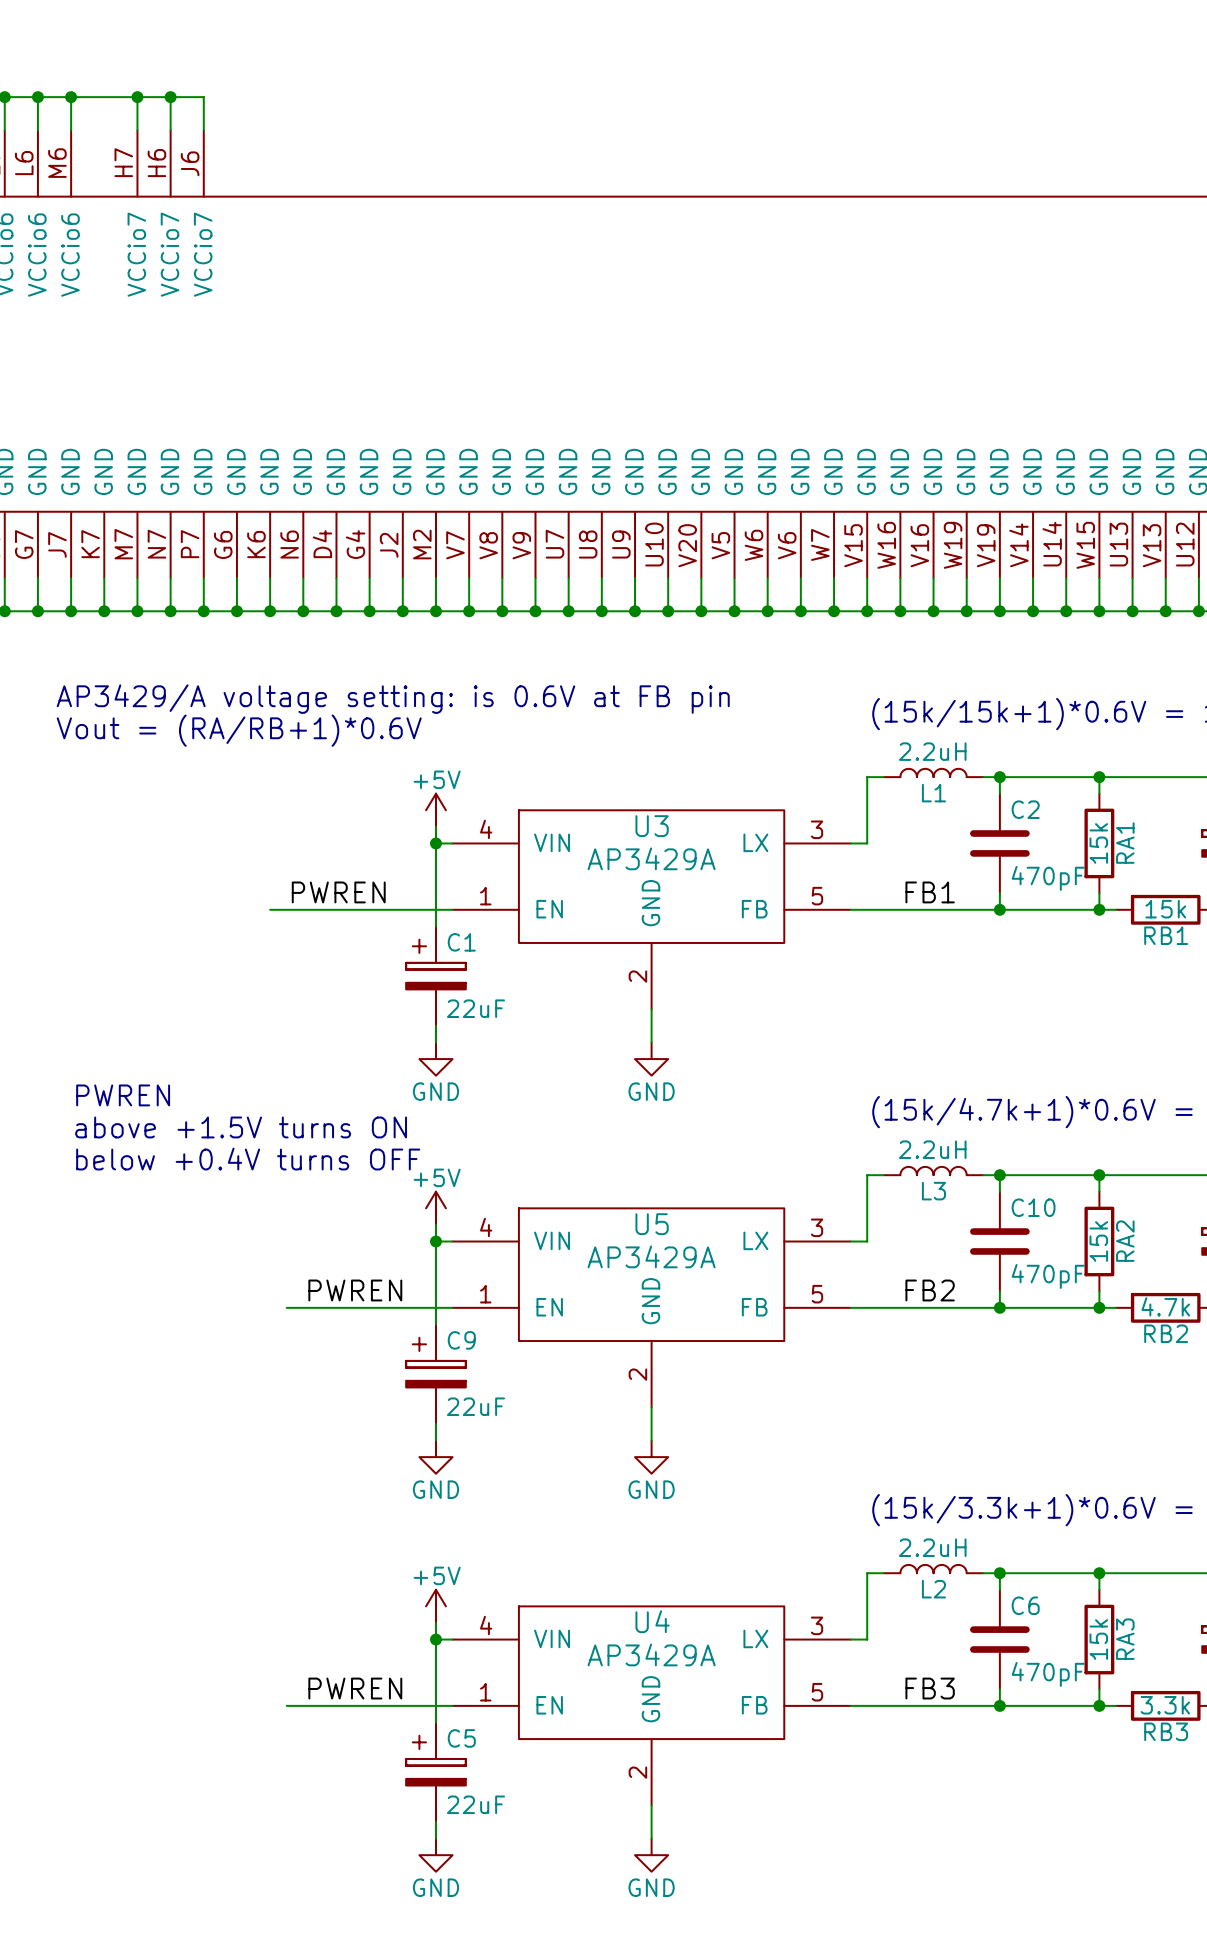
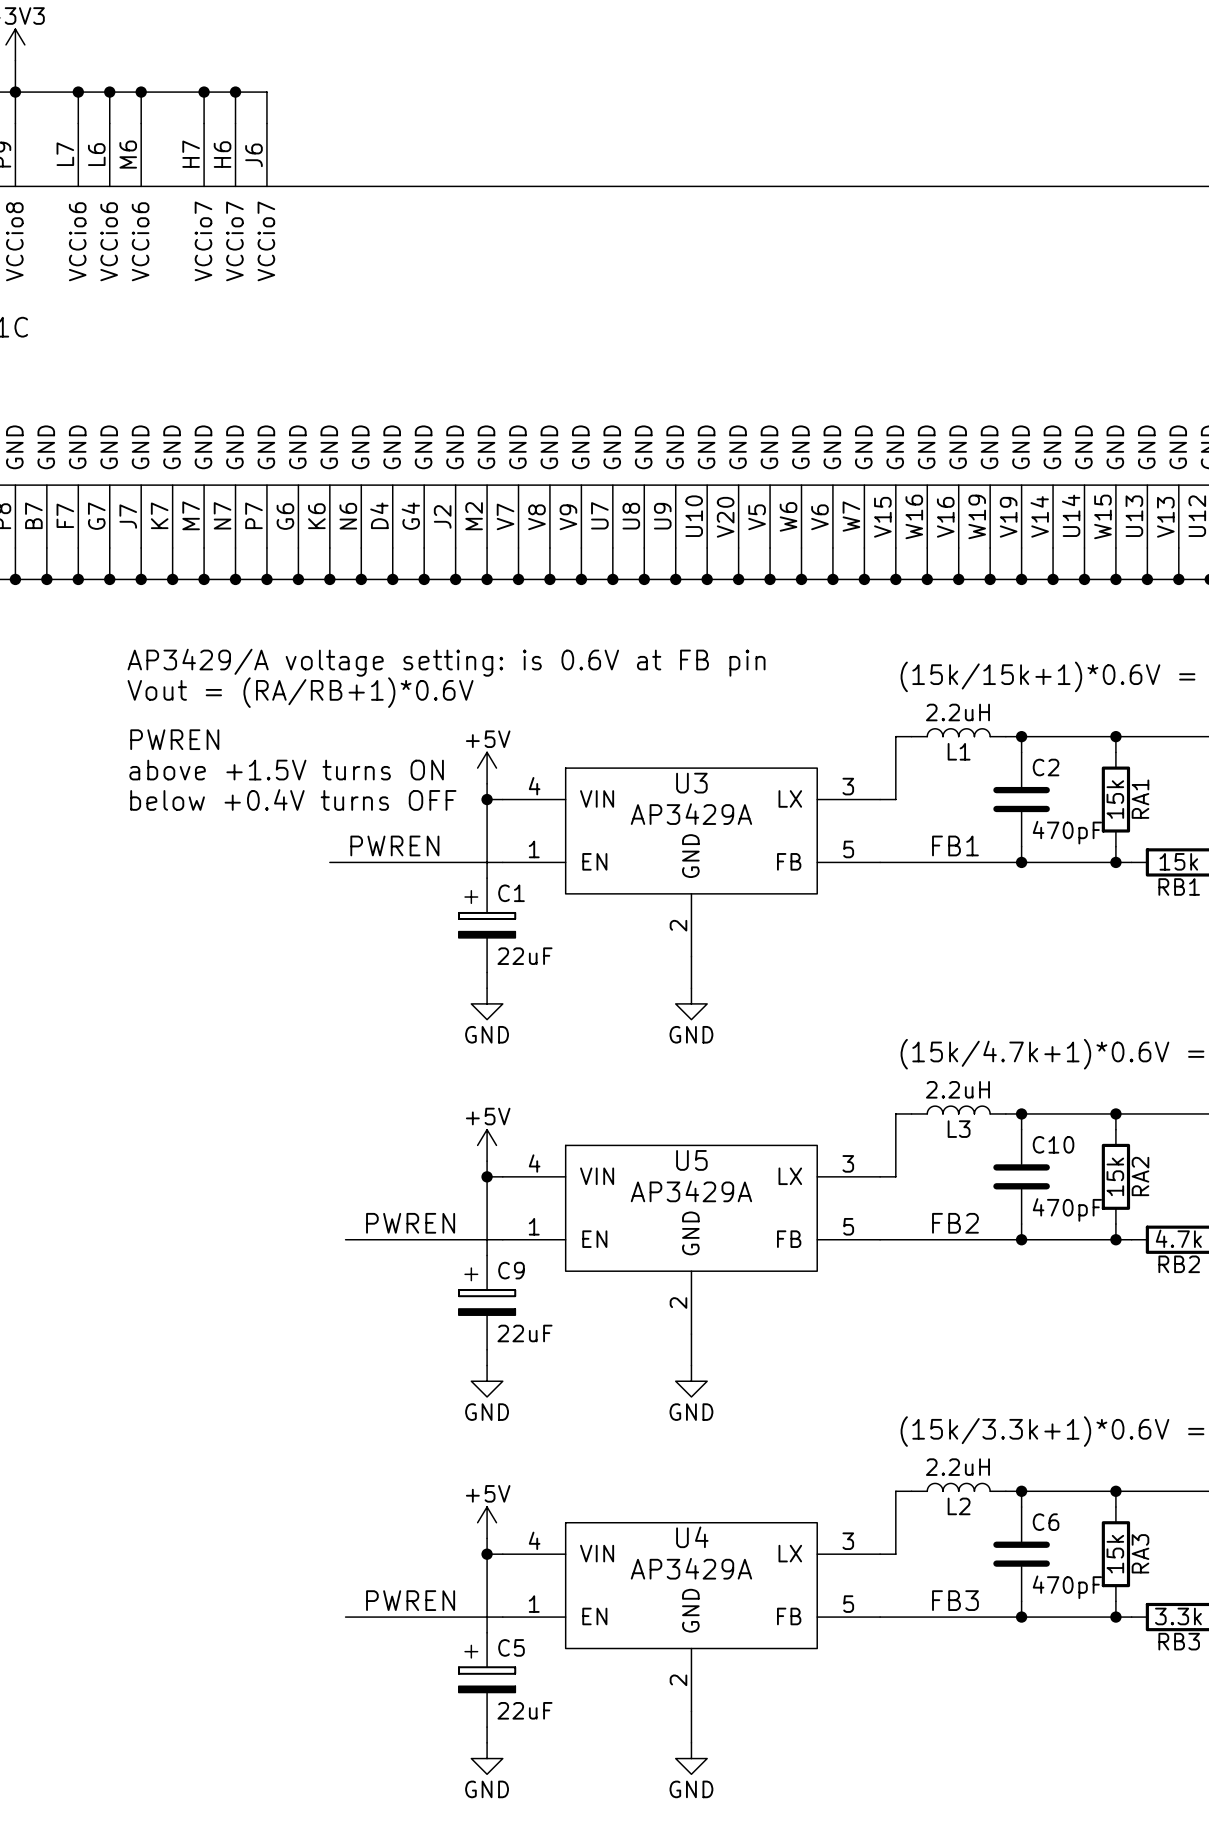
text position: PWREN (123, 1095) -> PWREN (174, 739)
text position: above +1.5V turns ON (241, 1127) -> above +1.5V turns ON (286, 770)
text position: below +0.4V turns OFF (248, 1159) -> below +0.4V turns OFF (293, 799)

